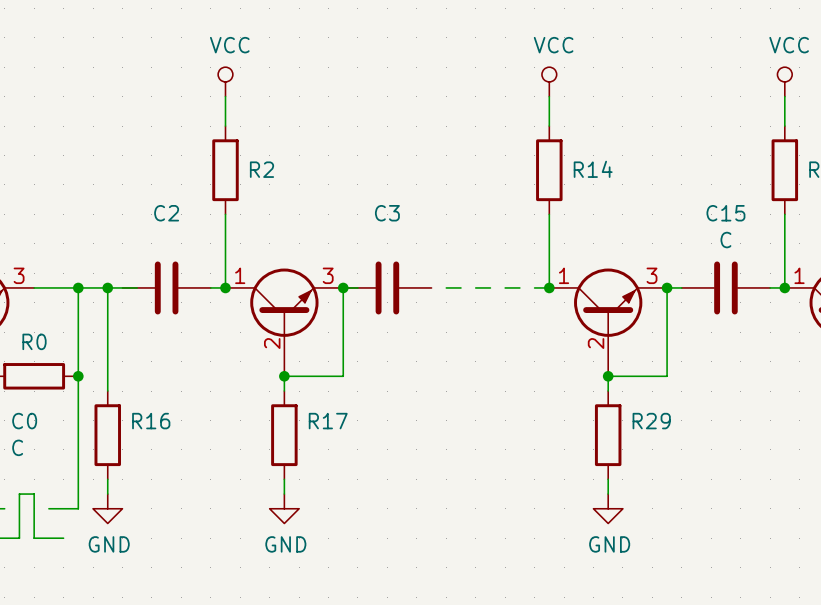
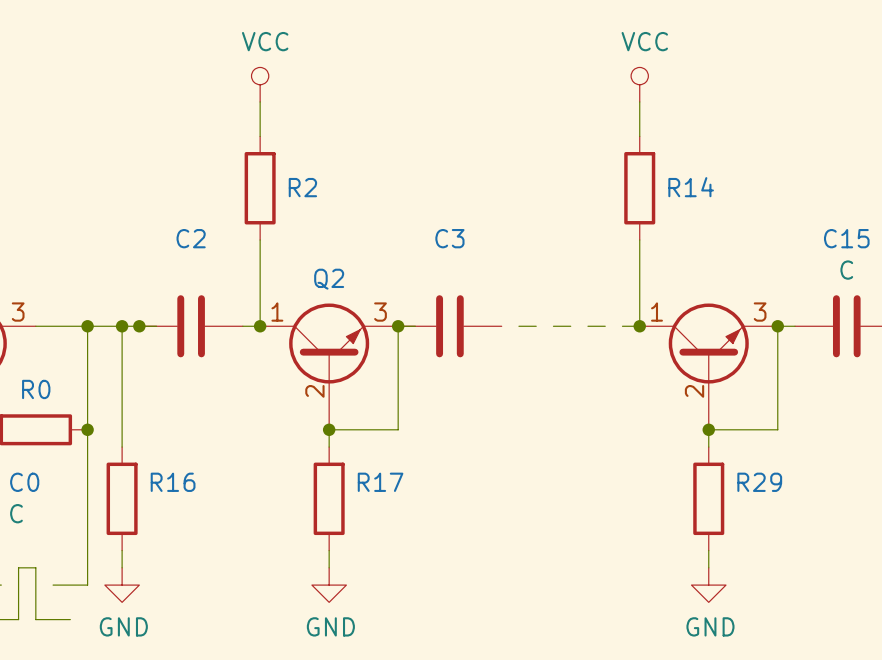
Q2 name: none -> Q2 (329, 279)
junction: none -> (139, 326)

